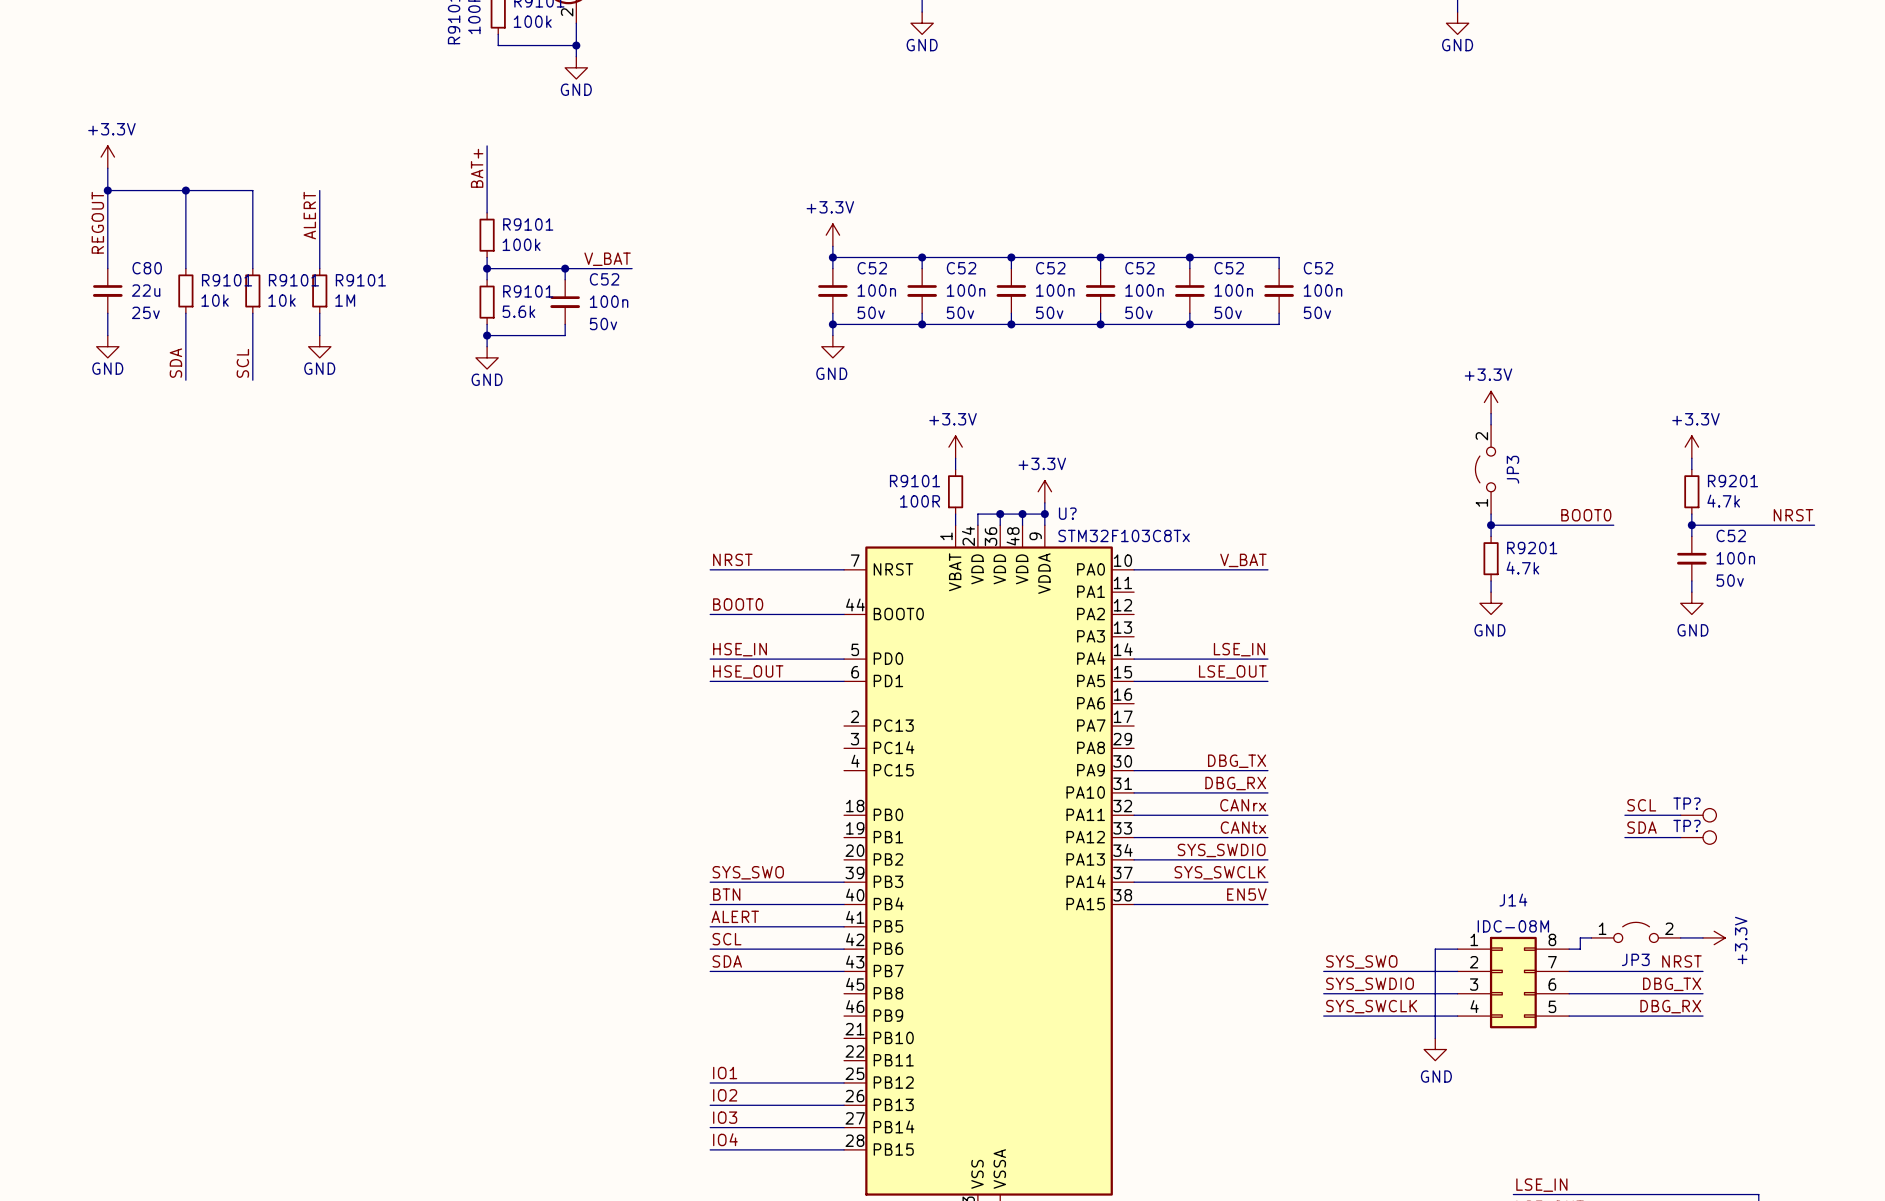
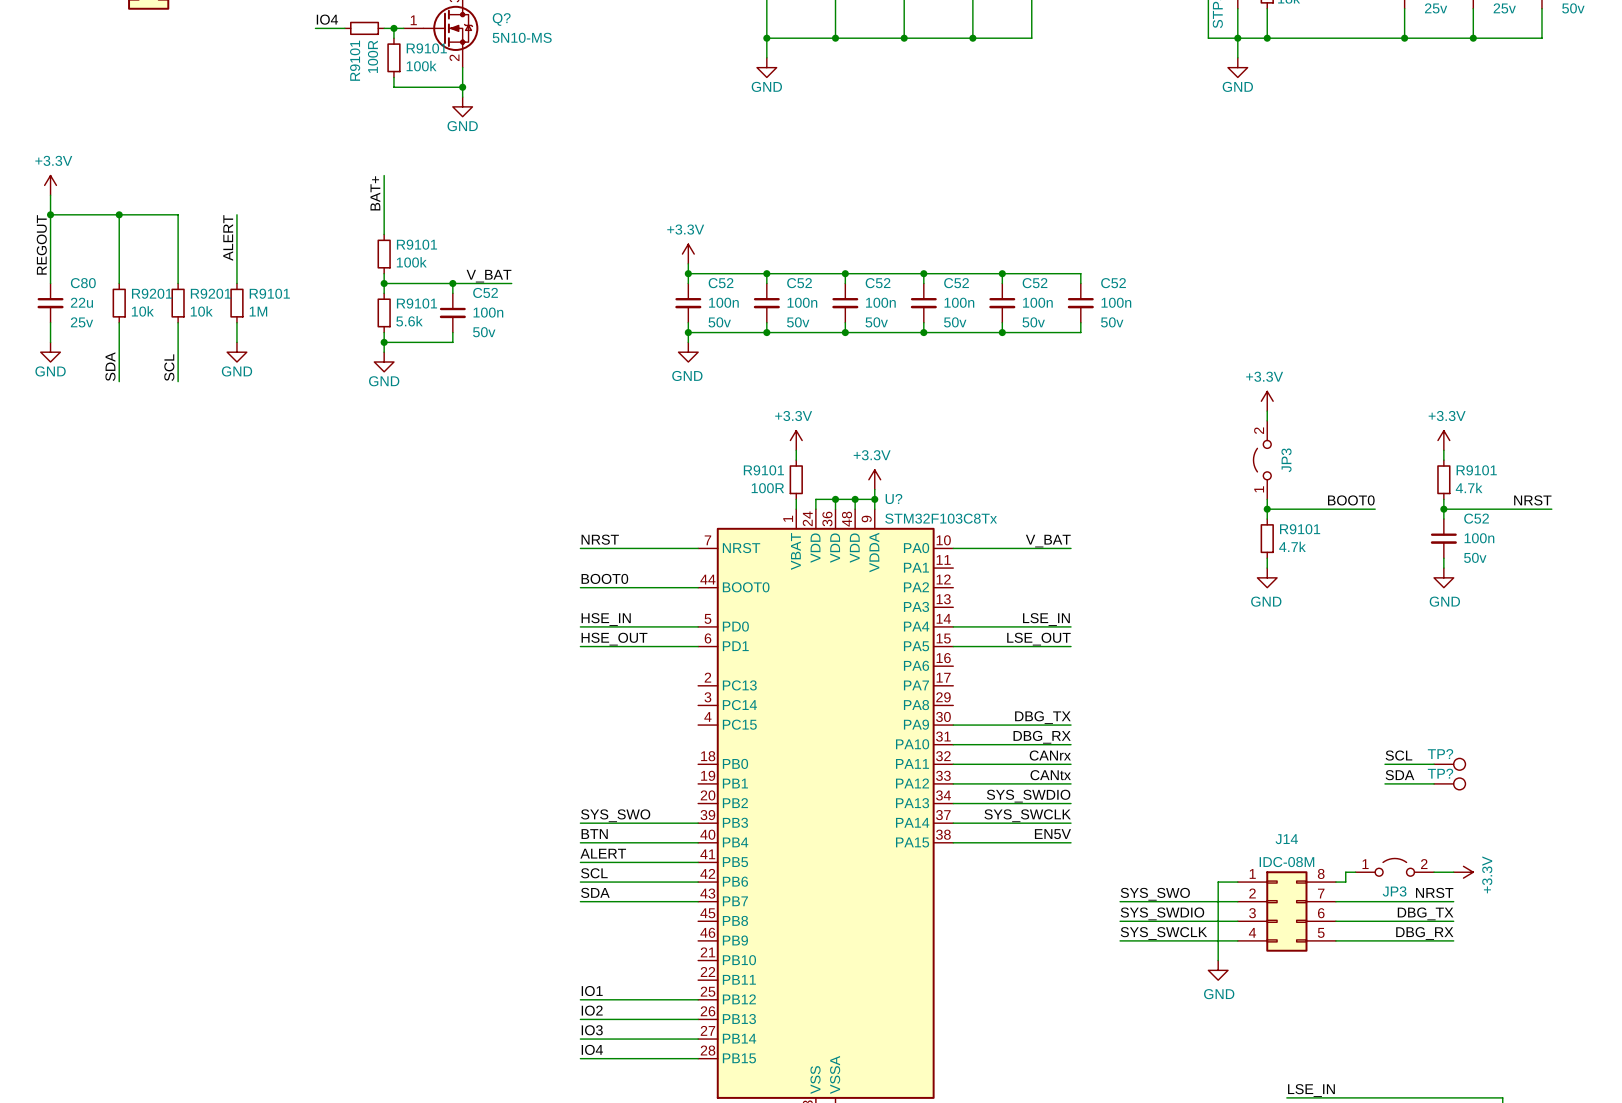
R9101 name: R9101 (227, 280) -> R9201 (152, 293)
R9101 name: R9101 (293, 280) -> R9201 (210, 293)
R9201 name: R9201 (1732, 481) -> R9101 (1476, 470)
R9201 name: R9201 (1532, 548) -> R9101 (1300, 529)

